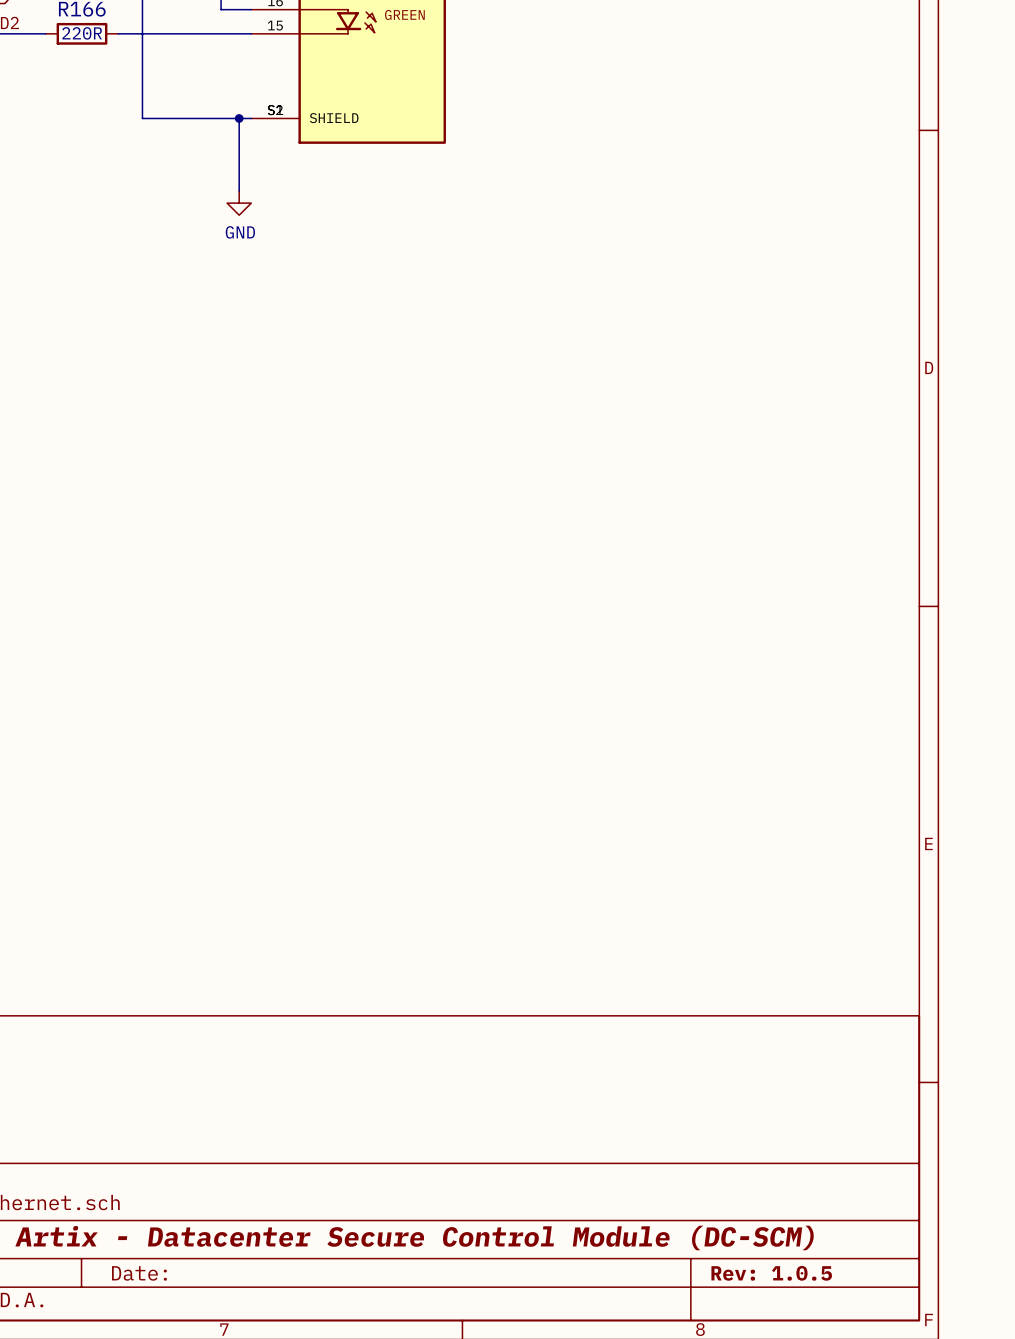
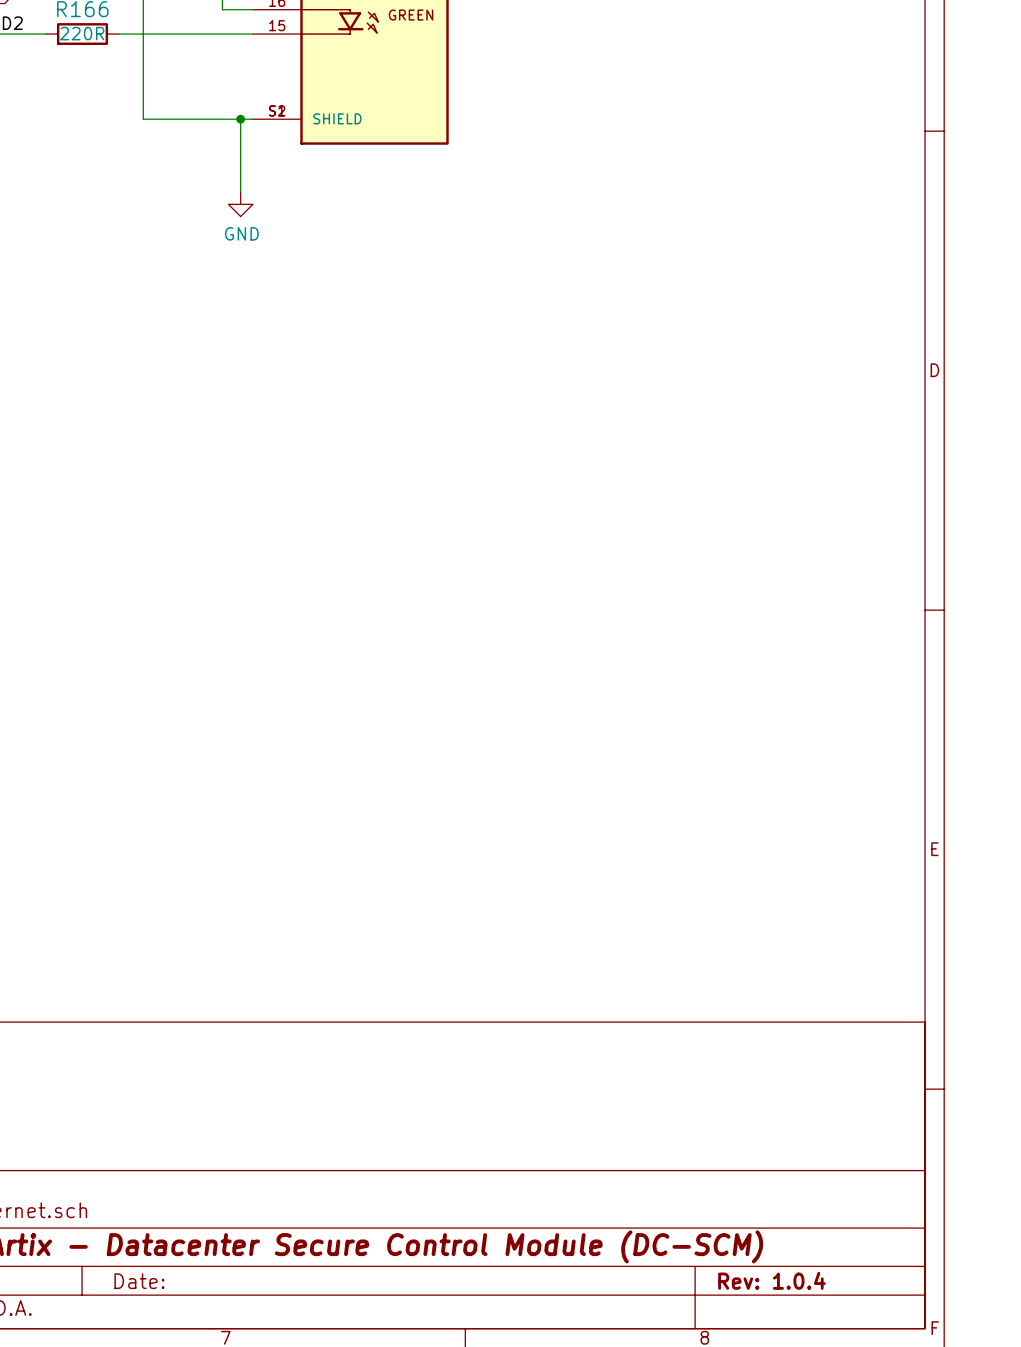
title block: Rev: 1.0.5 (771, 1273) -> Rev: 1.0.4 (771, 1280)

